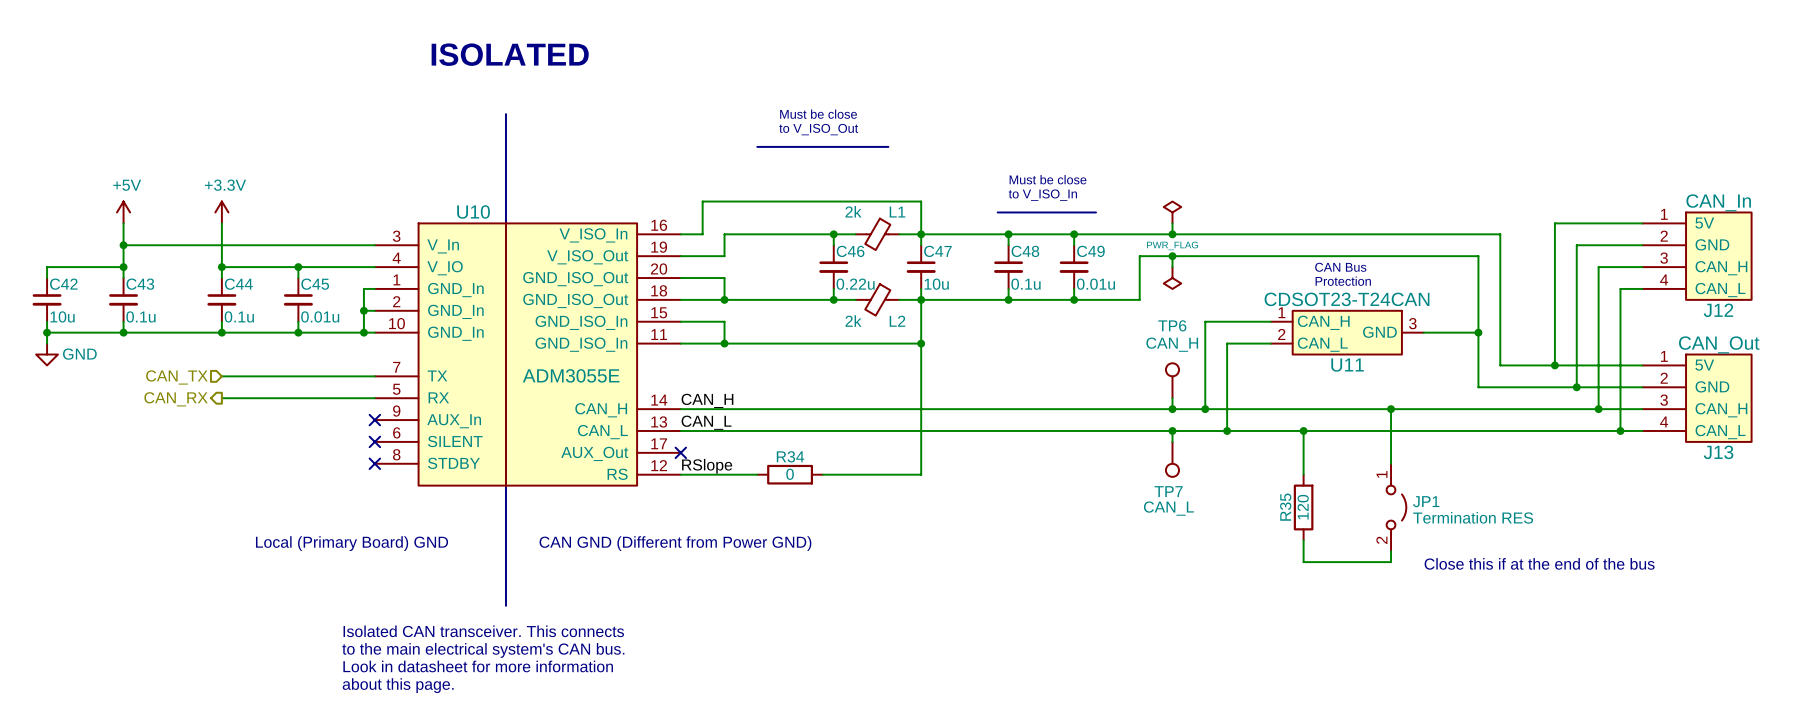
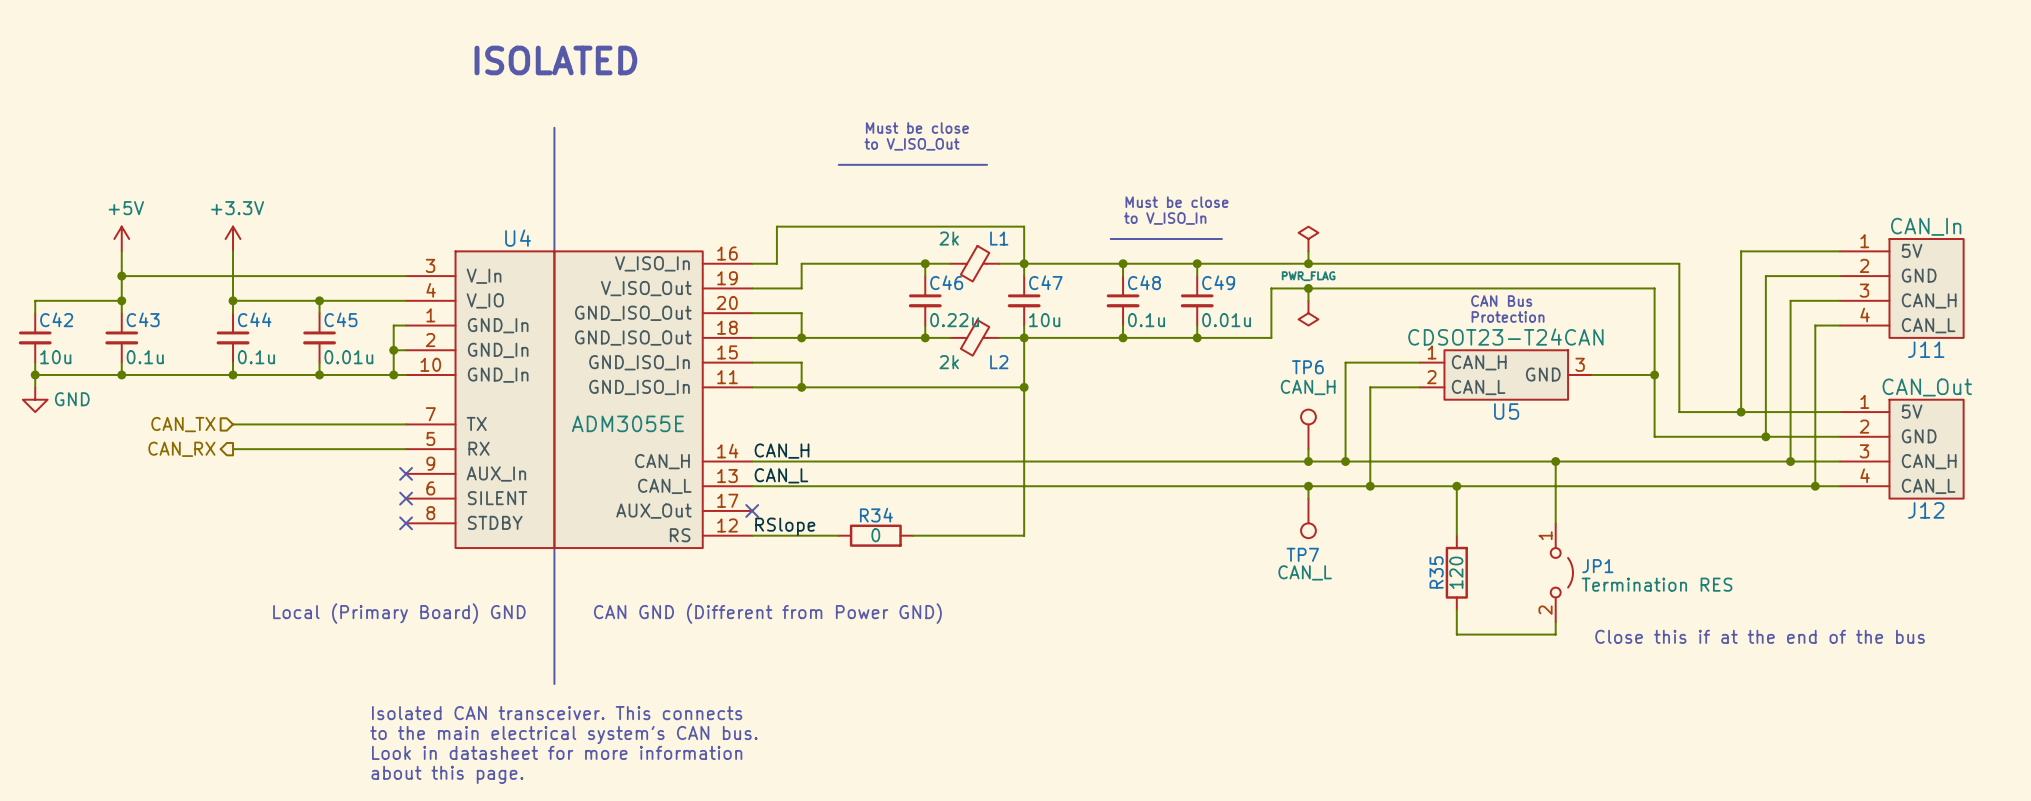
U10 name: U10 (473, 211) -> U4 (518, 238)
J12 name: J12 (1718, 310) -> J11 (1926, 349)
U11 name: U11 (1347, 365) -> U5 (1506, 411)
J13 name: J13 (1718, 452) -> J12 (1926, 510)

